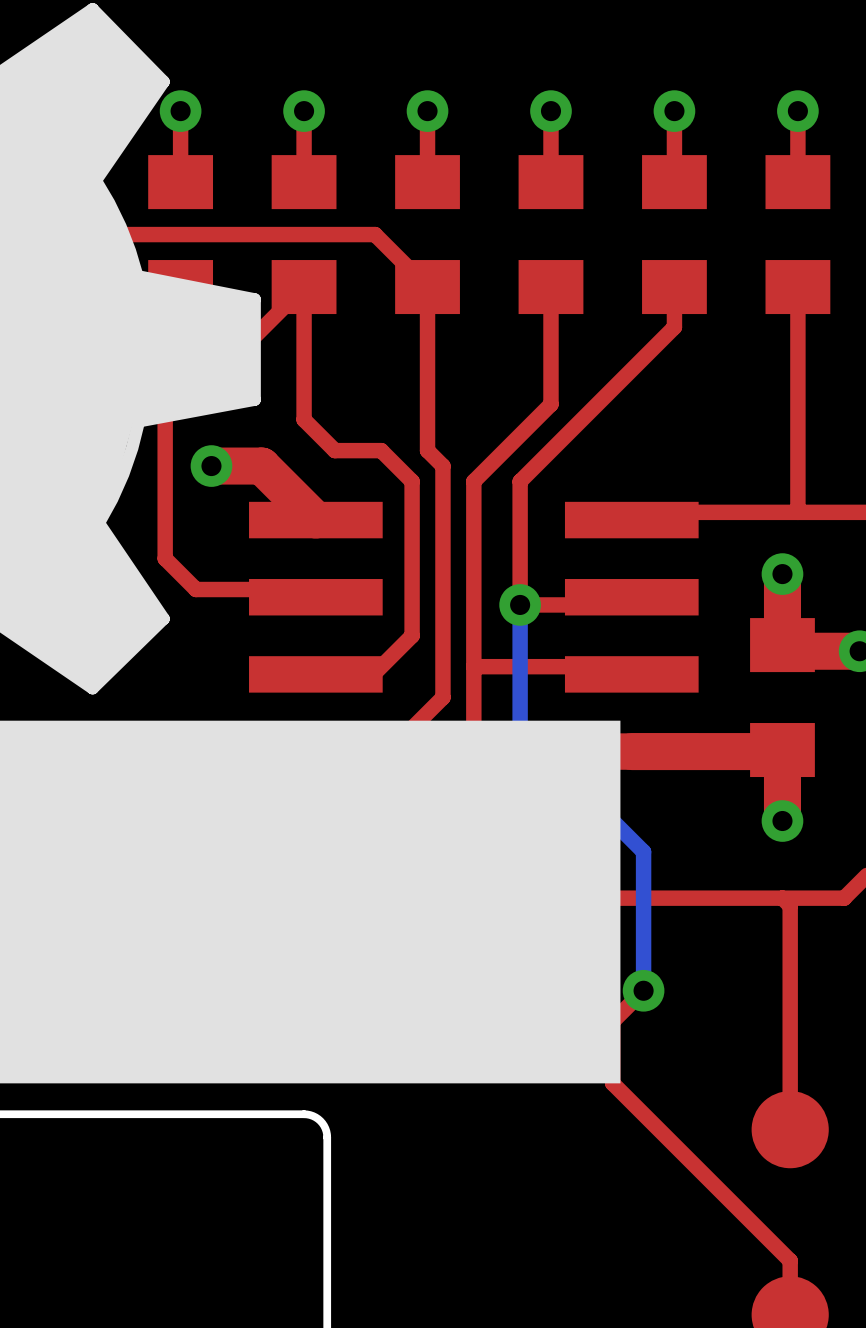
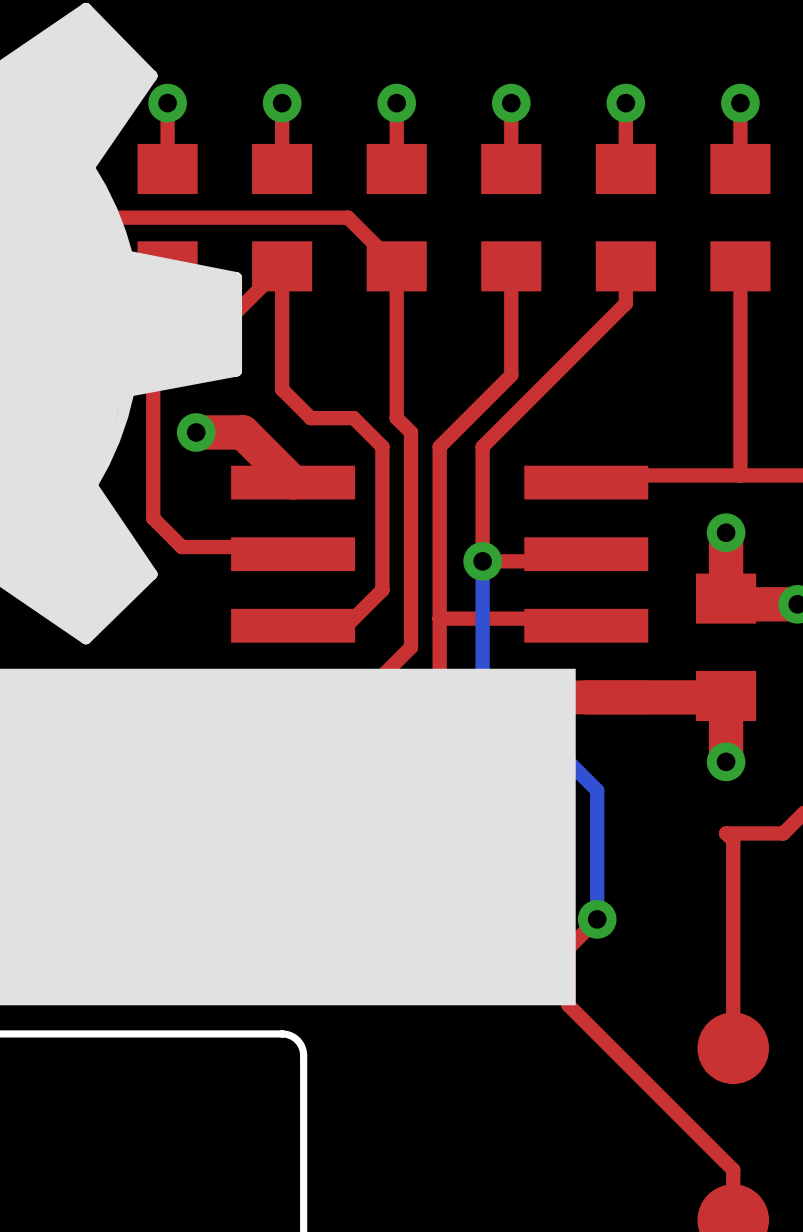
top track: (782, 898) (526, 898) -> none

